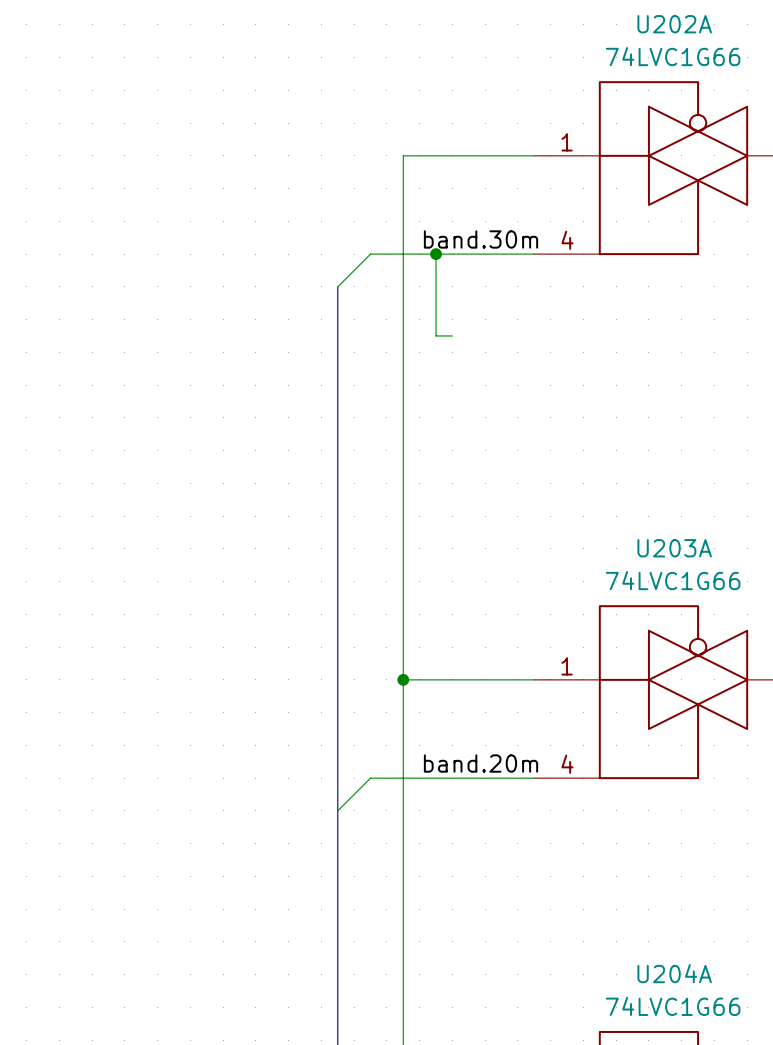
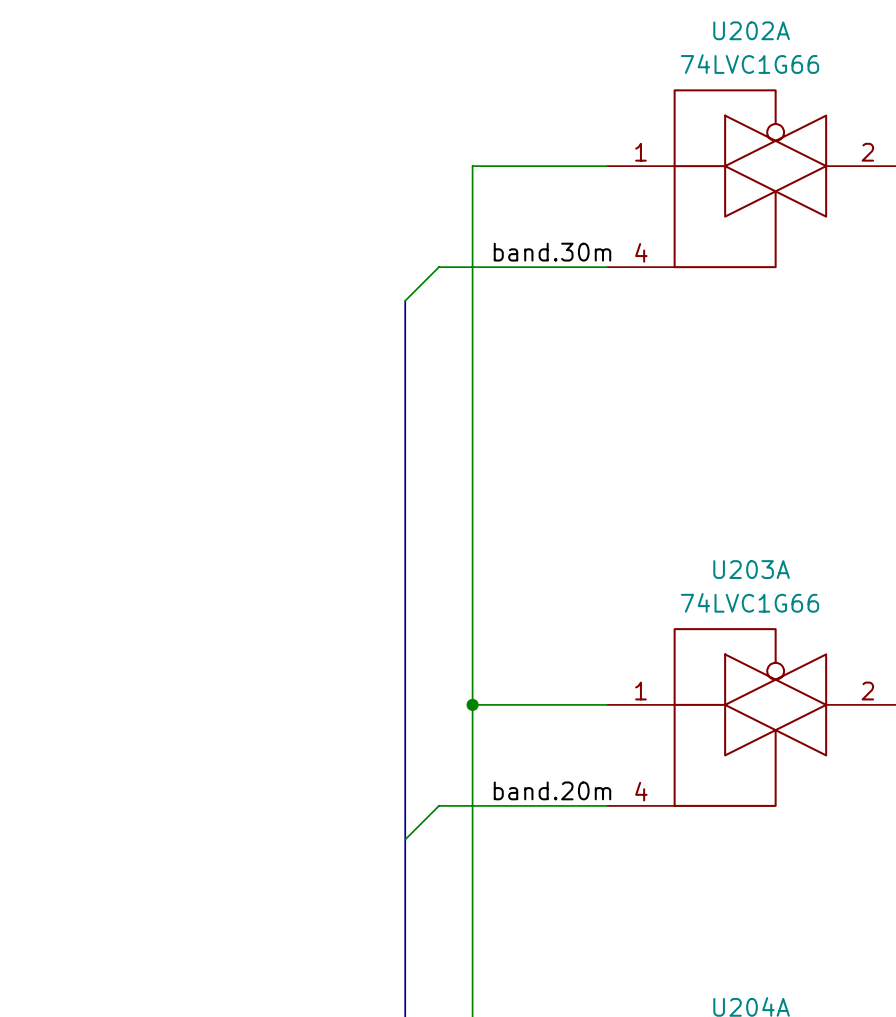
wire: (436, 254) (436, 335) (452, 335) -> none
junction: (436, 254) -> none

